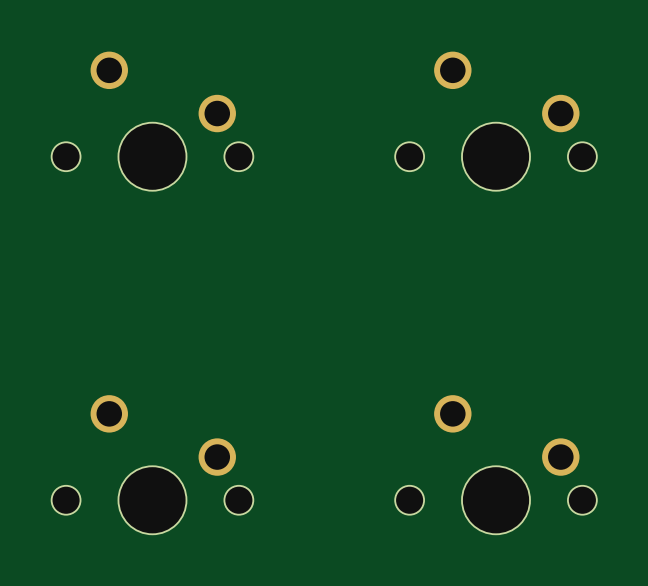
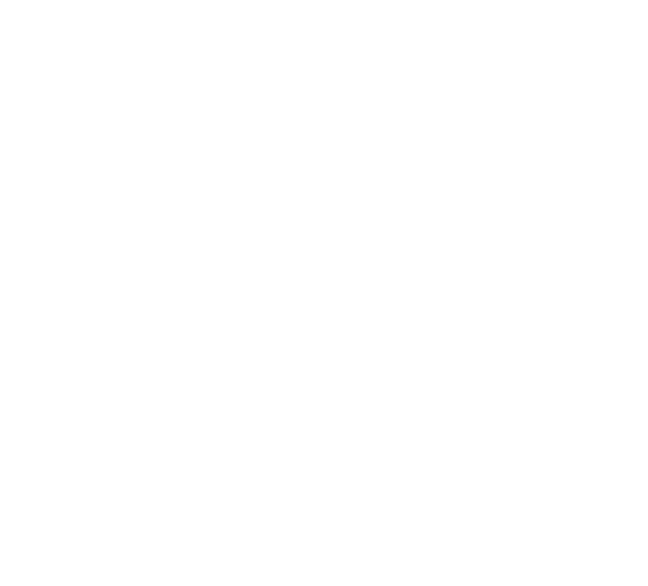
part: (152, 121) -> none
part: (496, 121) -> none
part: (152, 464) -> none
part: (496, 464) -> none

